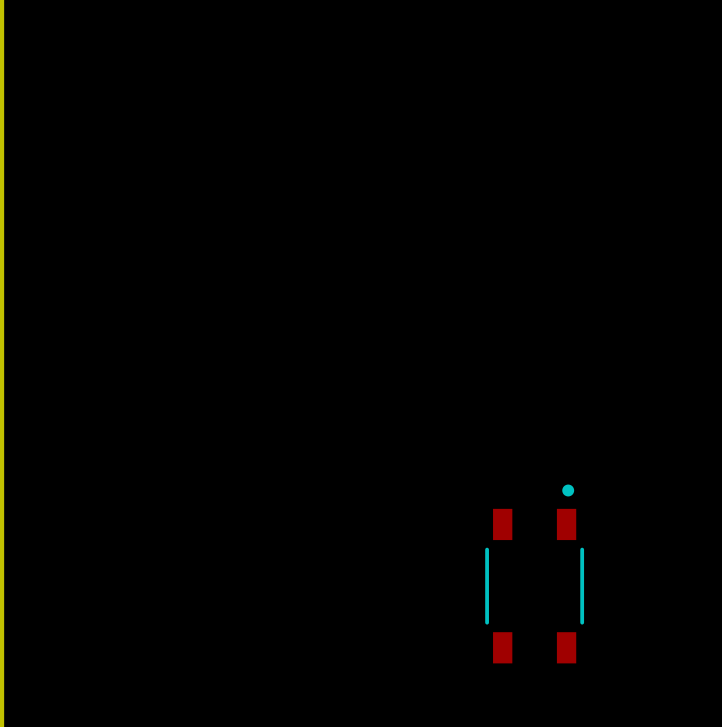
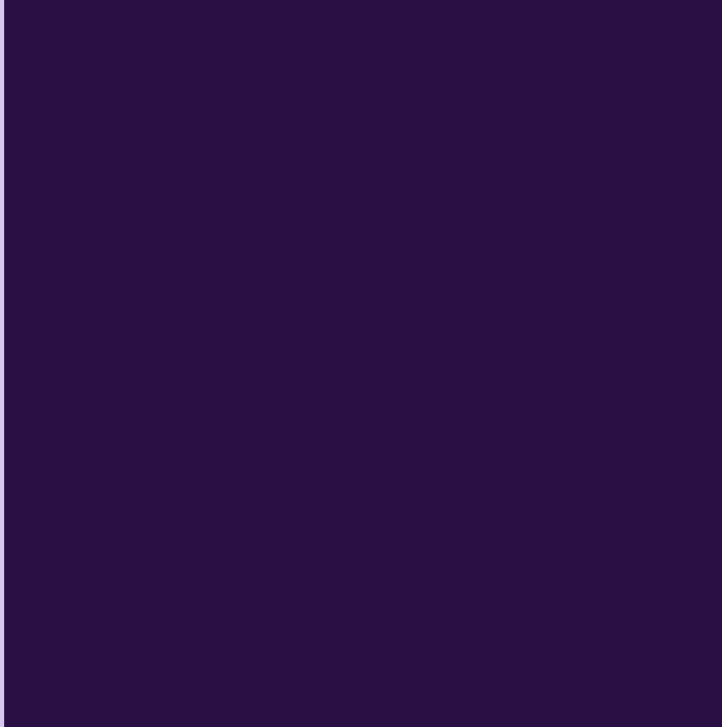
part: (534, 573) -> none

